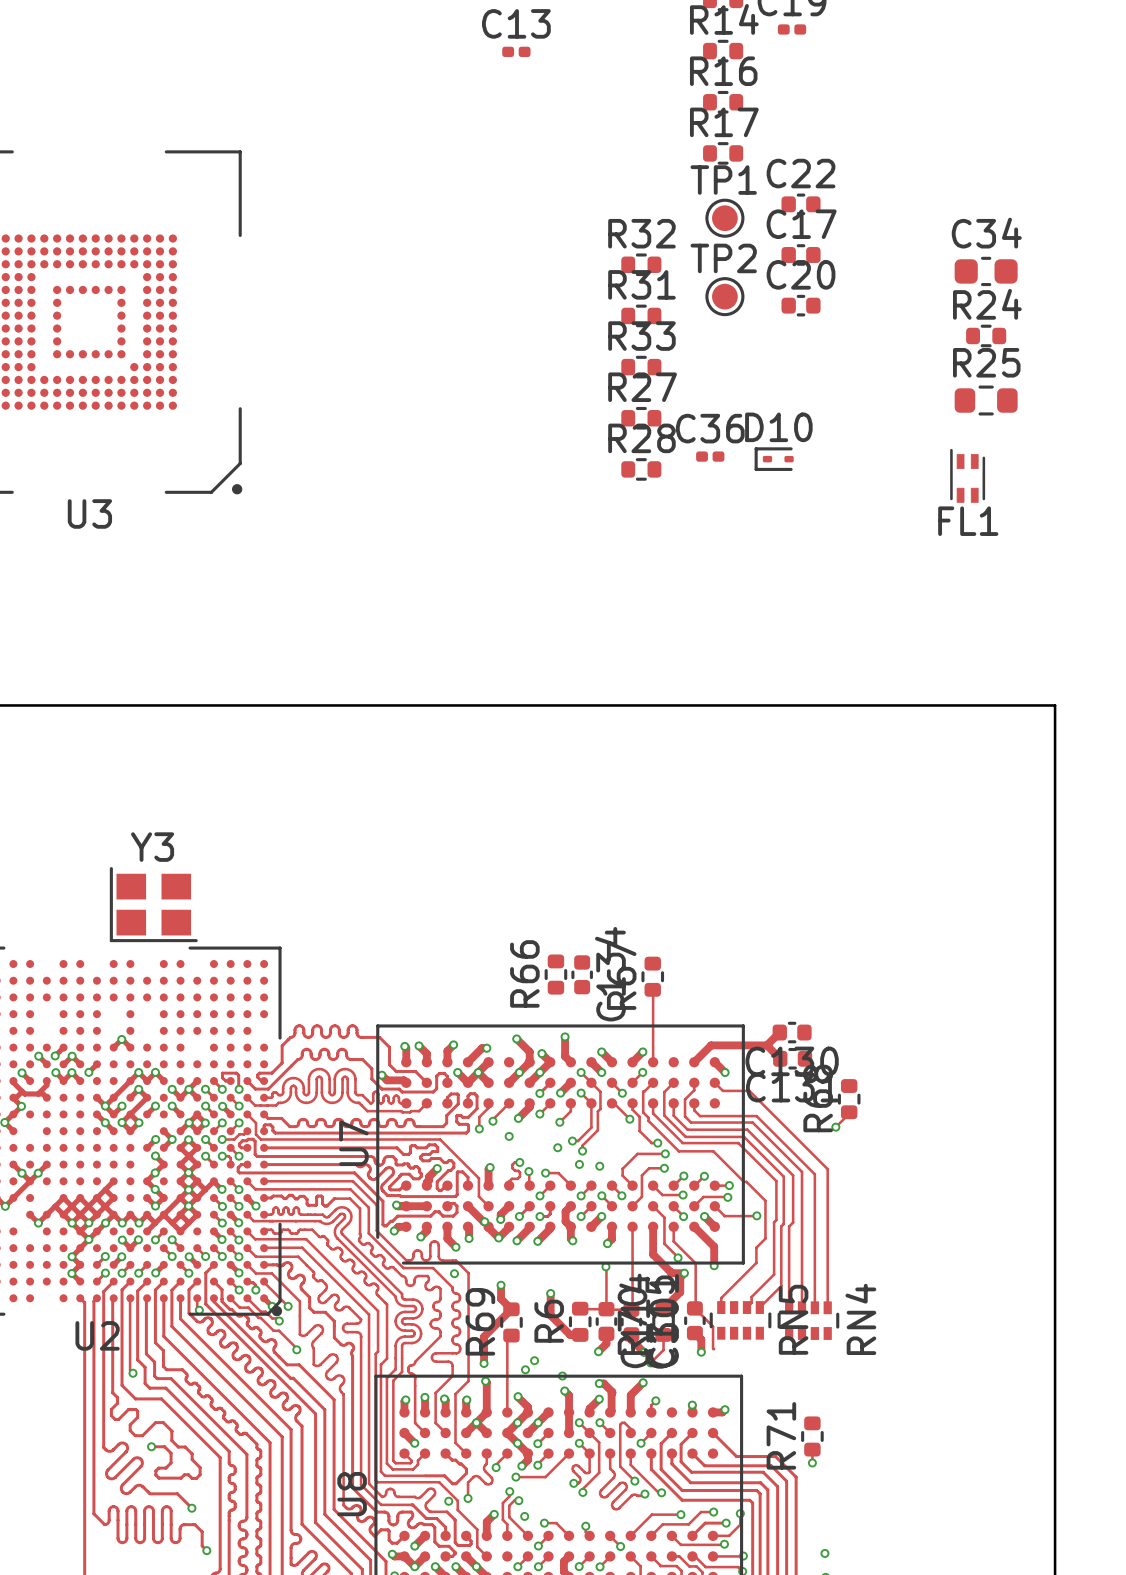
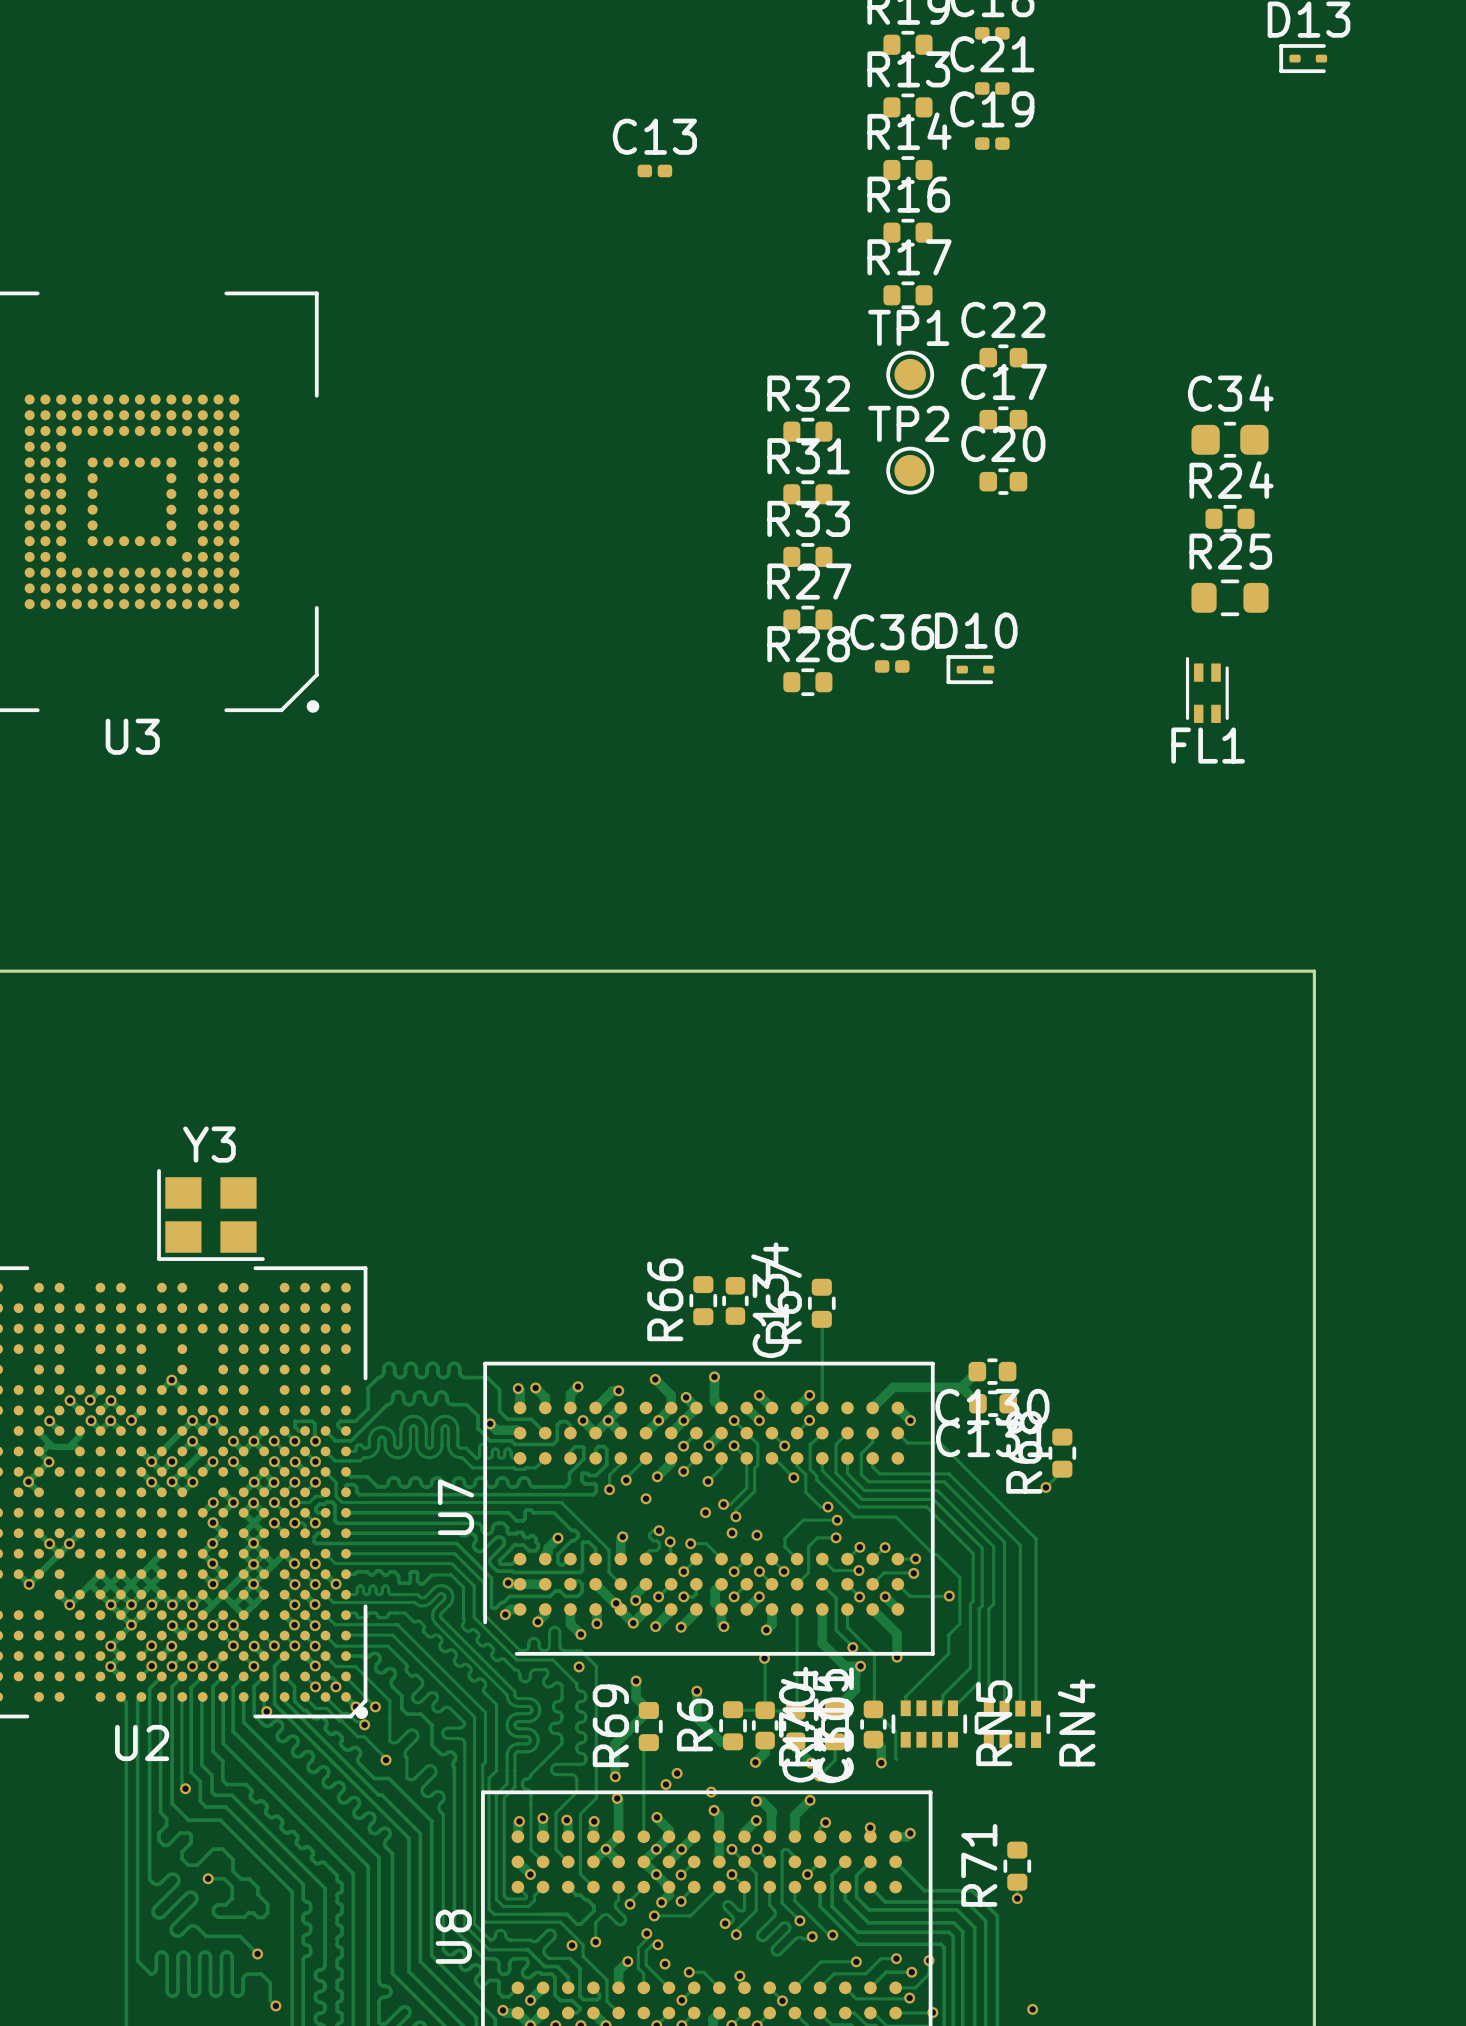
track: (426, 1147) (429, 1144) (435, 1144) (437, 1151) (423, 1154) (420, 1156) (423, 1160) (440, 1158) (444, 1162) (451, 1160) (453, 1164) -> (544, 1512) (554, 1512) (571, 1530) (578, 1533)

